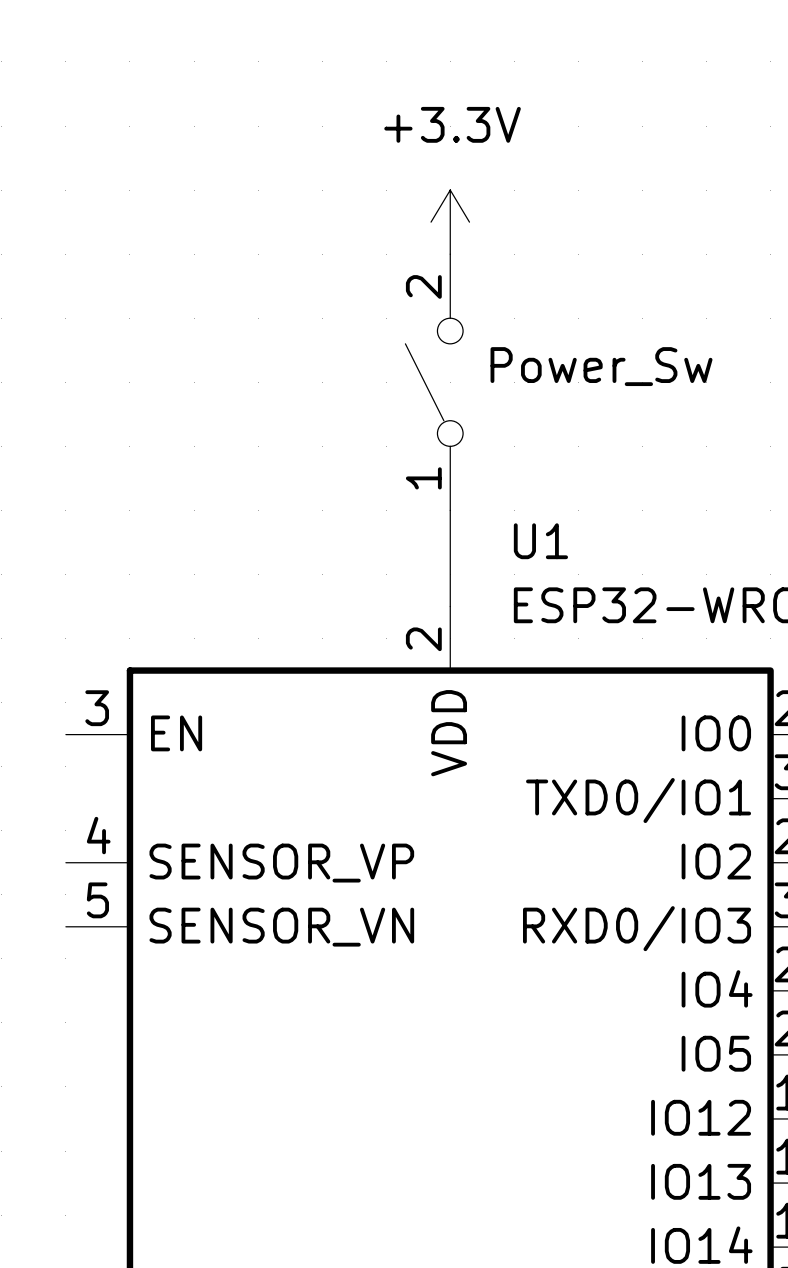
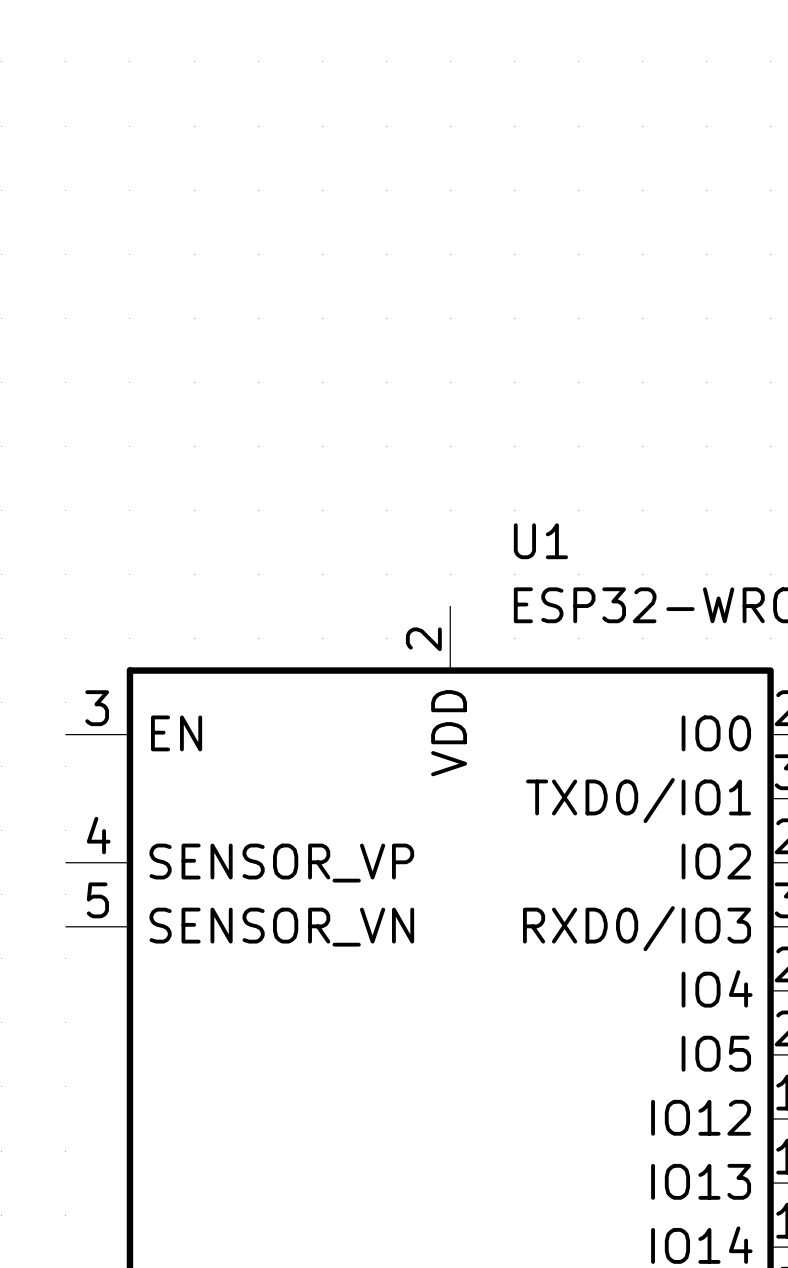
power symbol: +3.3V (450, 222) -> none
Power_Sw: (434, 382) -> none
wire: (450, 510) (450, 606) -> none

